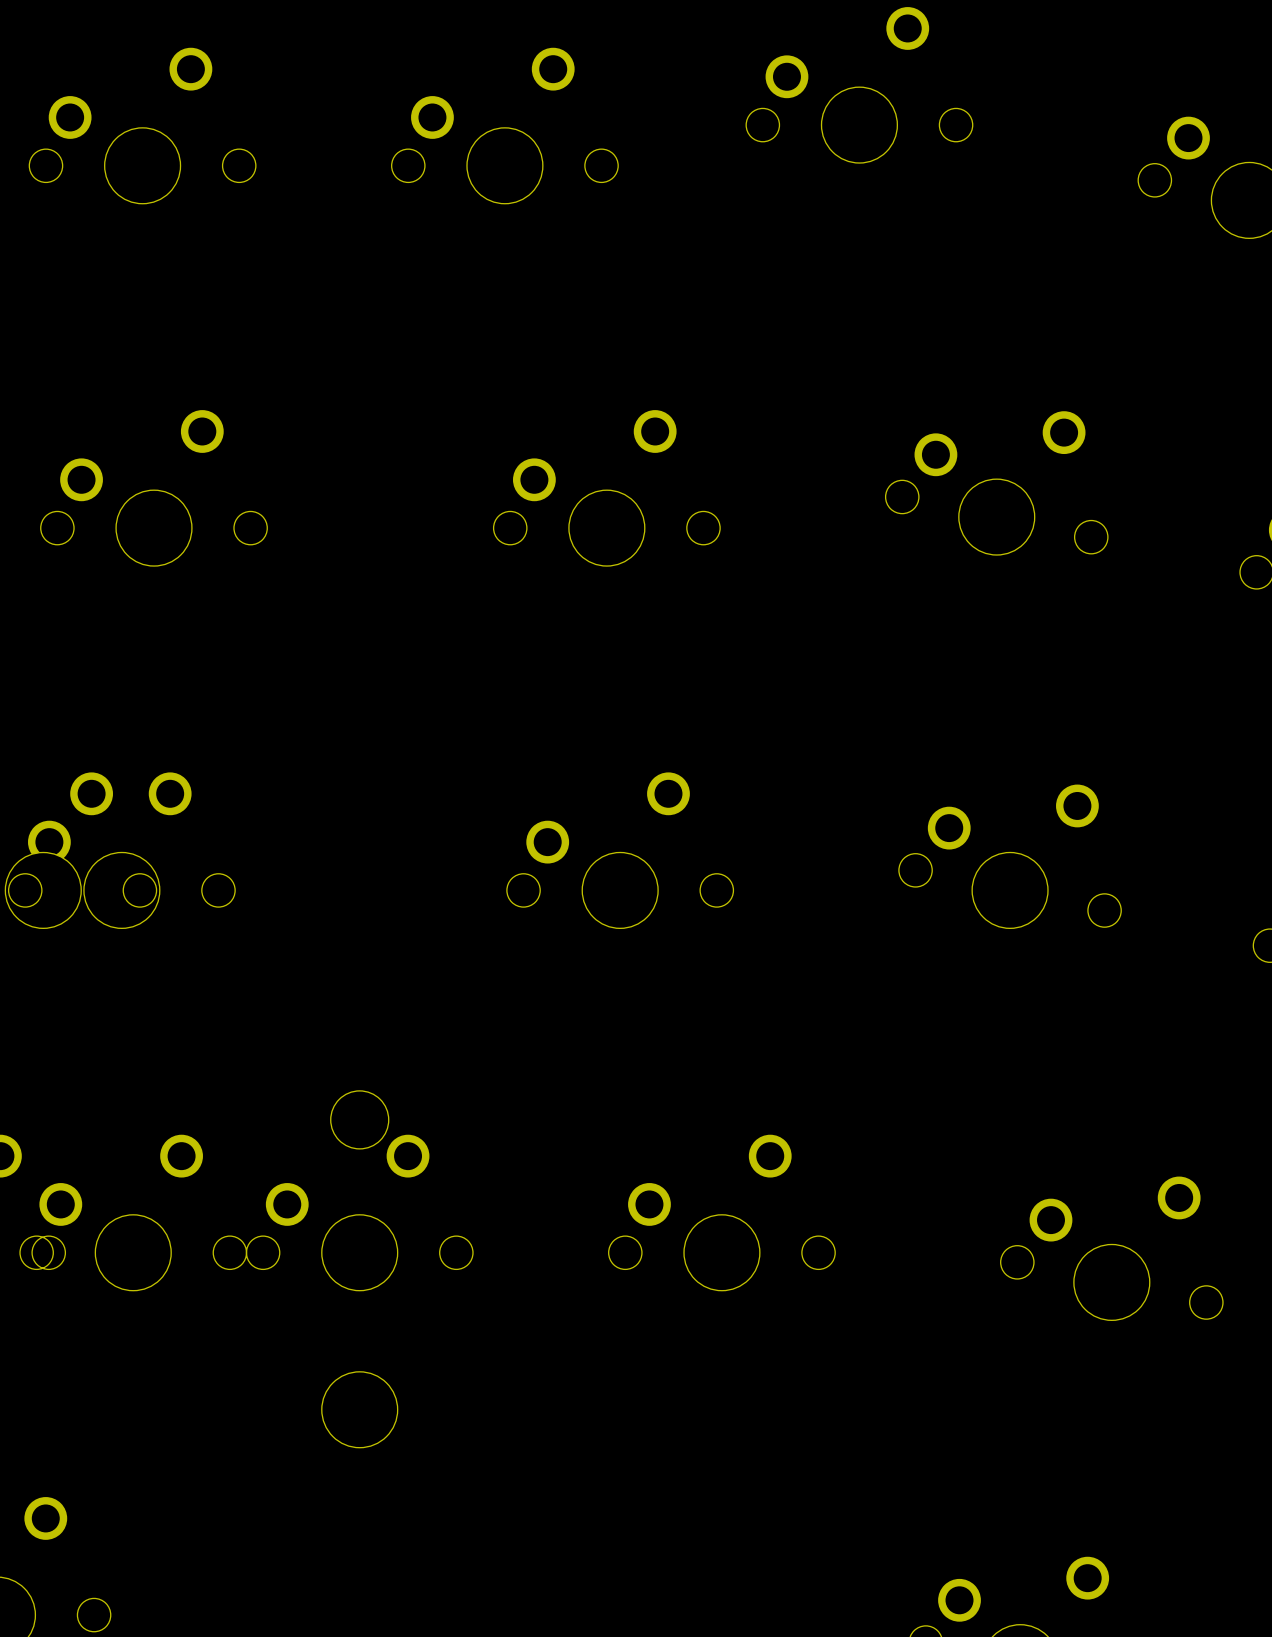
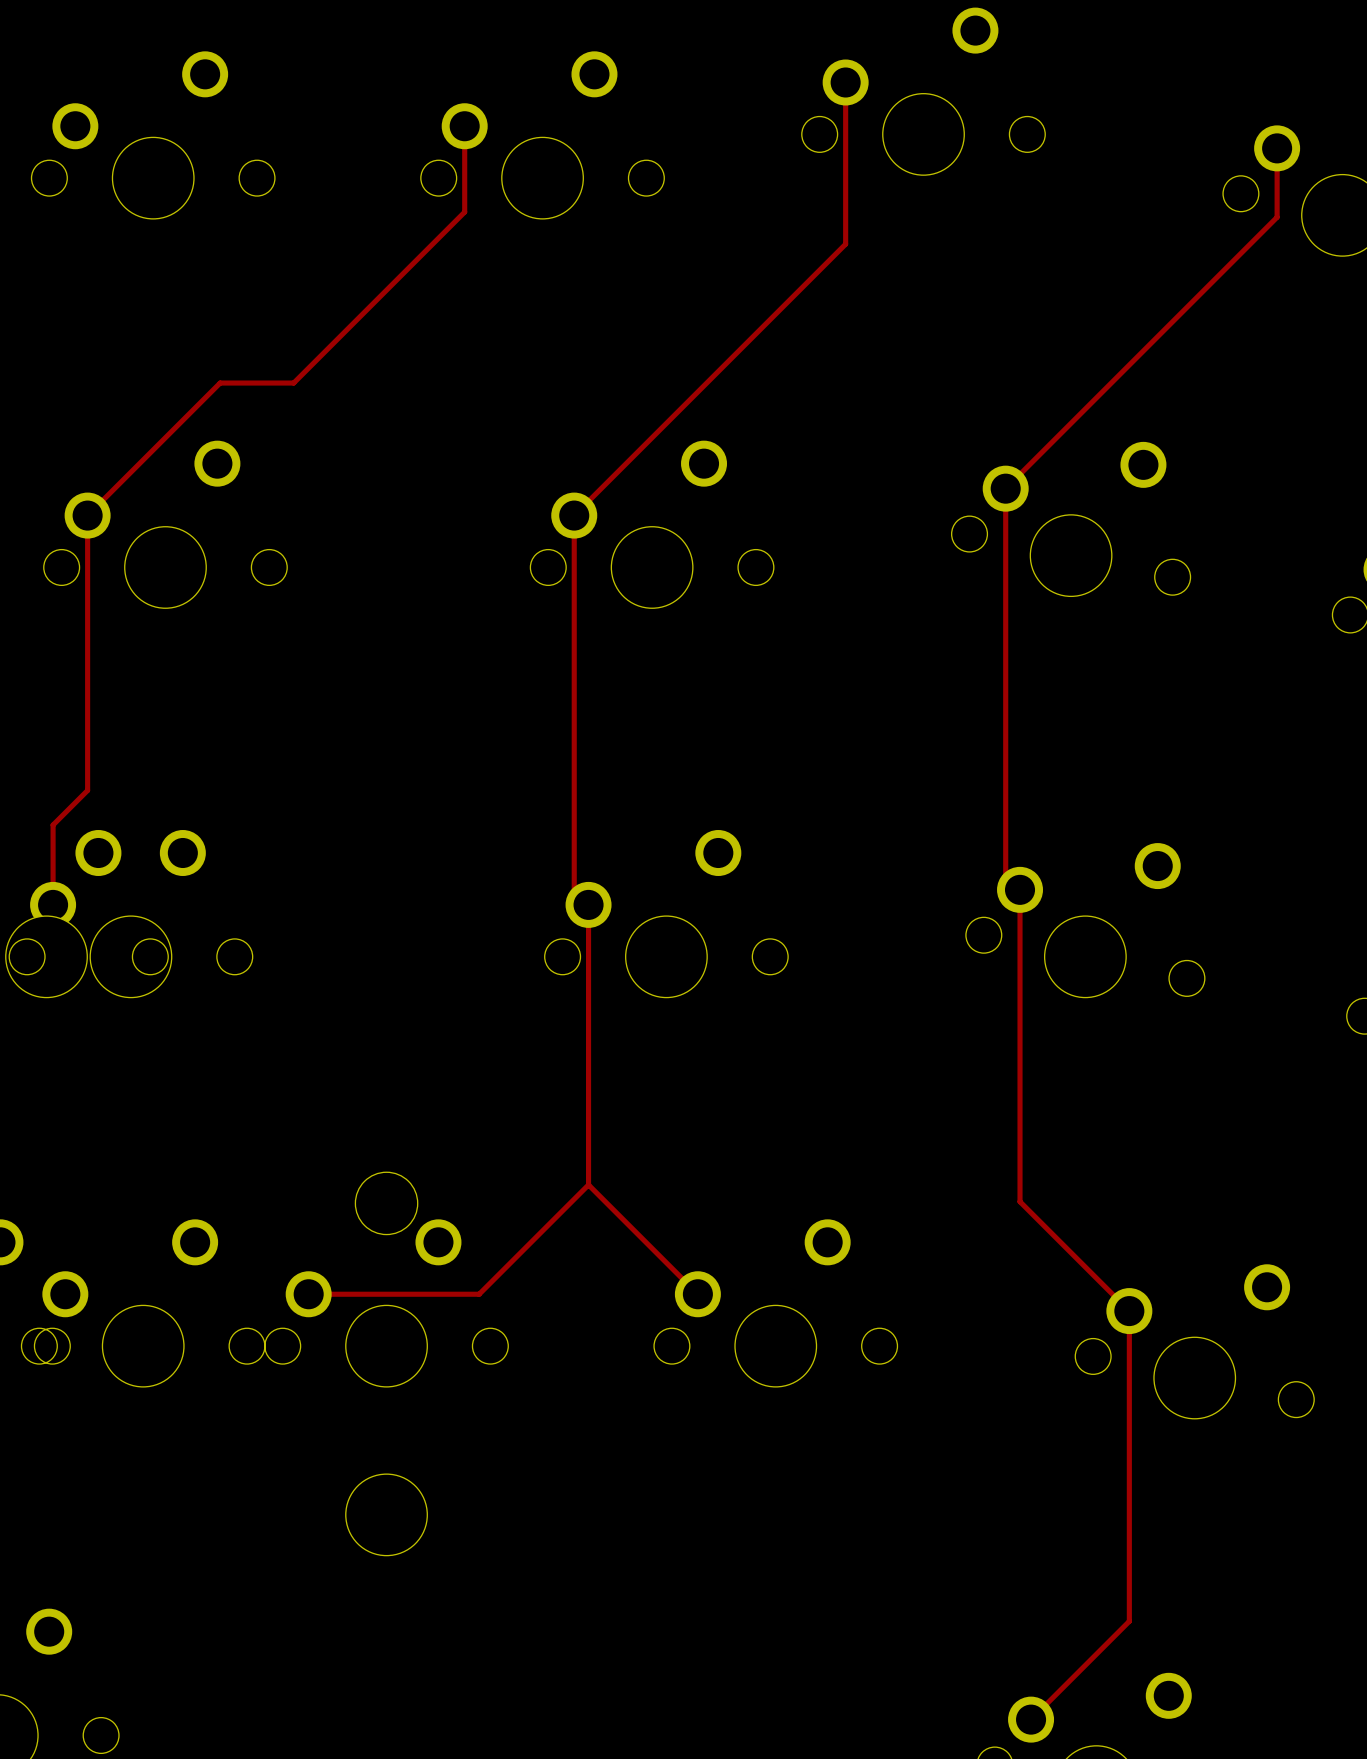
track: none -> (845, 82) (845, 244) (574, 515) (574, 890) (588, 904) (588, 1184)
track: none -> (464, 126) (464, 212) (293, 383) (220, 383) (87, 515) (87, 790) (53, 825) (53, 904)
track: none -> (1277, 148) (1277, 217) (1005, 488) (1005, 875) (1020, 889) (1020, 1201) (1129, 1311) (1129, 1621) (1031, 1719)
track: none -> (588, 1184) (697, 1294)
track: none -> (588, 1184) (479, 1294) (308, 1294)

